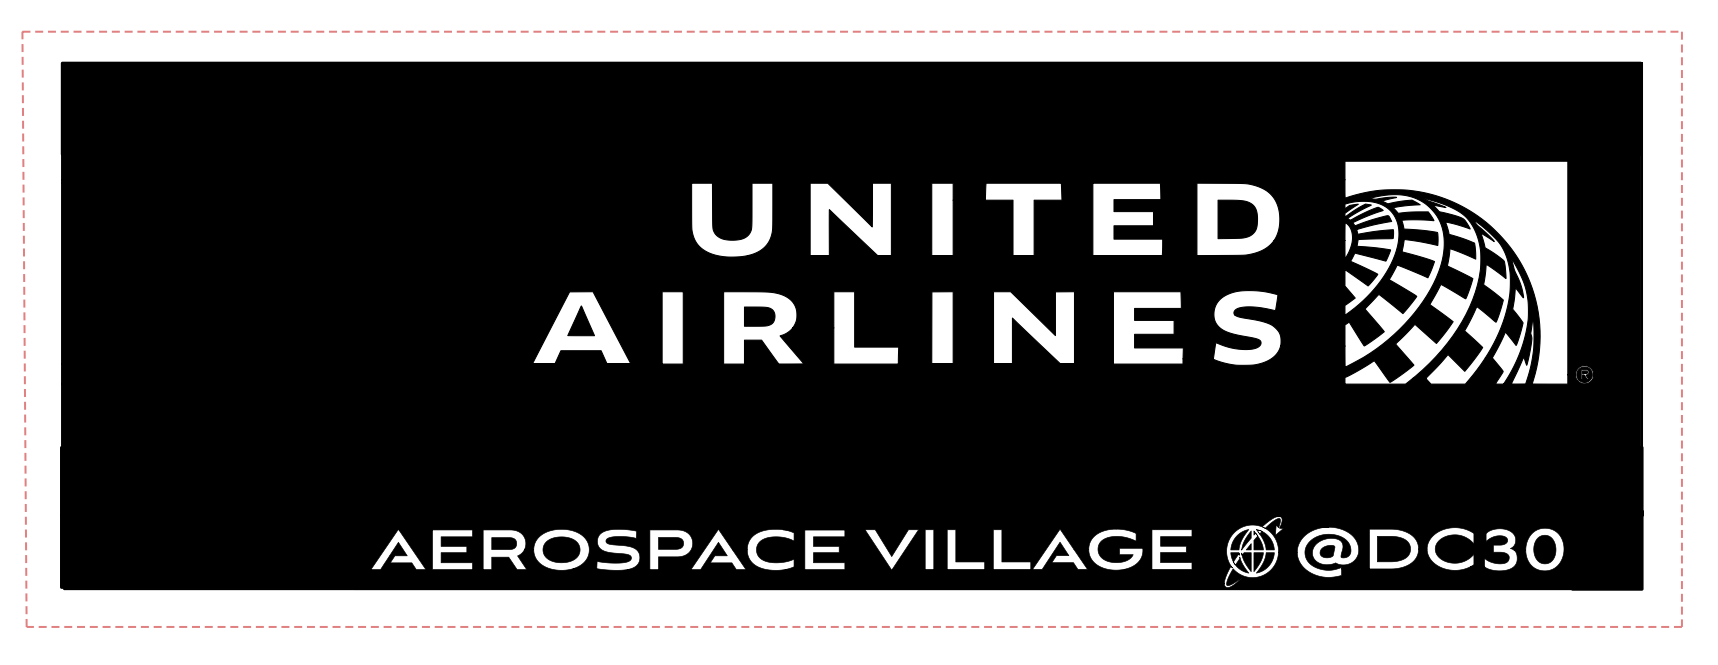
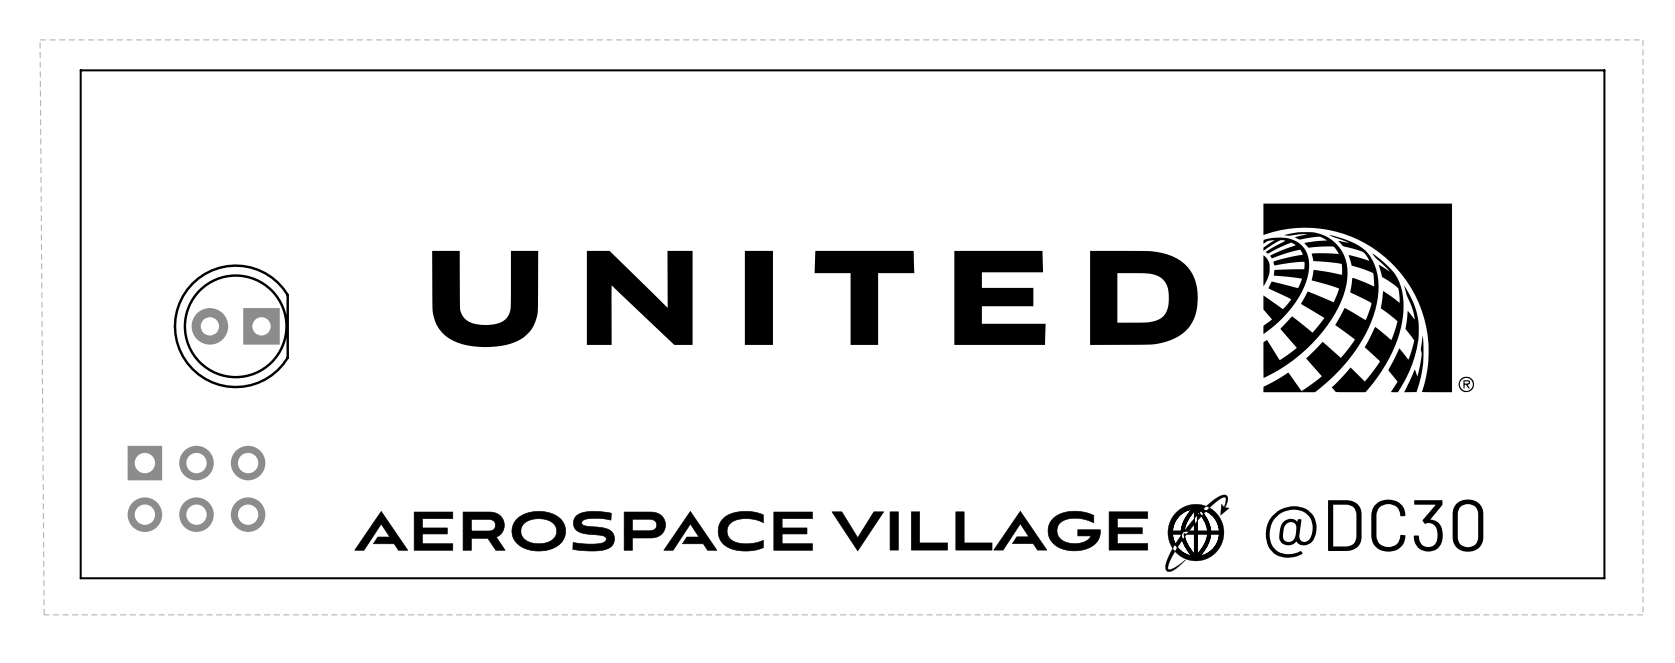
drawing: [60, 61, 1644, 591] -> none
drawing: none -> [432, 203, 1475, 393]
drawing: none -> [354, 494, 1230, 572]
line: none -> (1191, 509) (1184, 520) (1181, 531) (1172, 531) (1178, 516) (1191, 509)
line: none -> (1200, 509) (1207, 520) (1210, 531) (1219, 531) (1213, 516) (1200, 509)
line: none -> (1194, 510) (1194, 531) (1184, 531) (1187, 521) (1194, 510)
line: none -> (1197, 510) (1197, 531) (1207, 531) (1204, 521) (1197, 510)
text: none -> @DC30 (1374, 528)
line: none -> (1172, 534) (1181, 534) (1184, 544) (1191, 556) (1178, 548) (1172, 534)
line: none -> (1184, 534) (1194, 534) (1194, 554) (1187, 543) (1184, 534)
line: none -> (1197, 534) (1207, 534) (1204, 543) (1197, 554) (1197, 534)
line: none -> (1210, 534) (1219, 534) (1217, 542) (1209, 551) (1199, 556) (1207, 544) (1210, 534)

